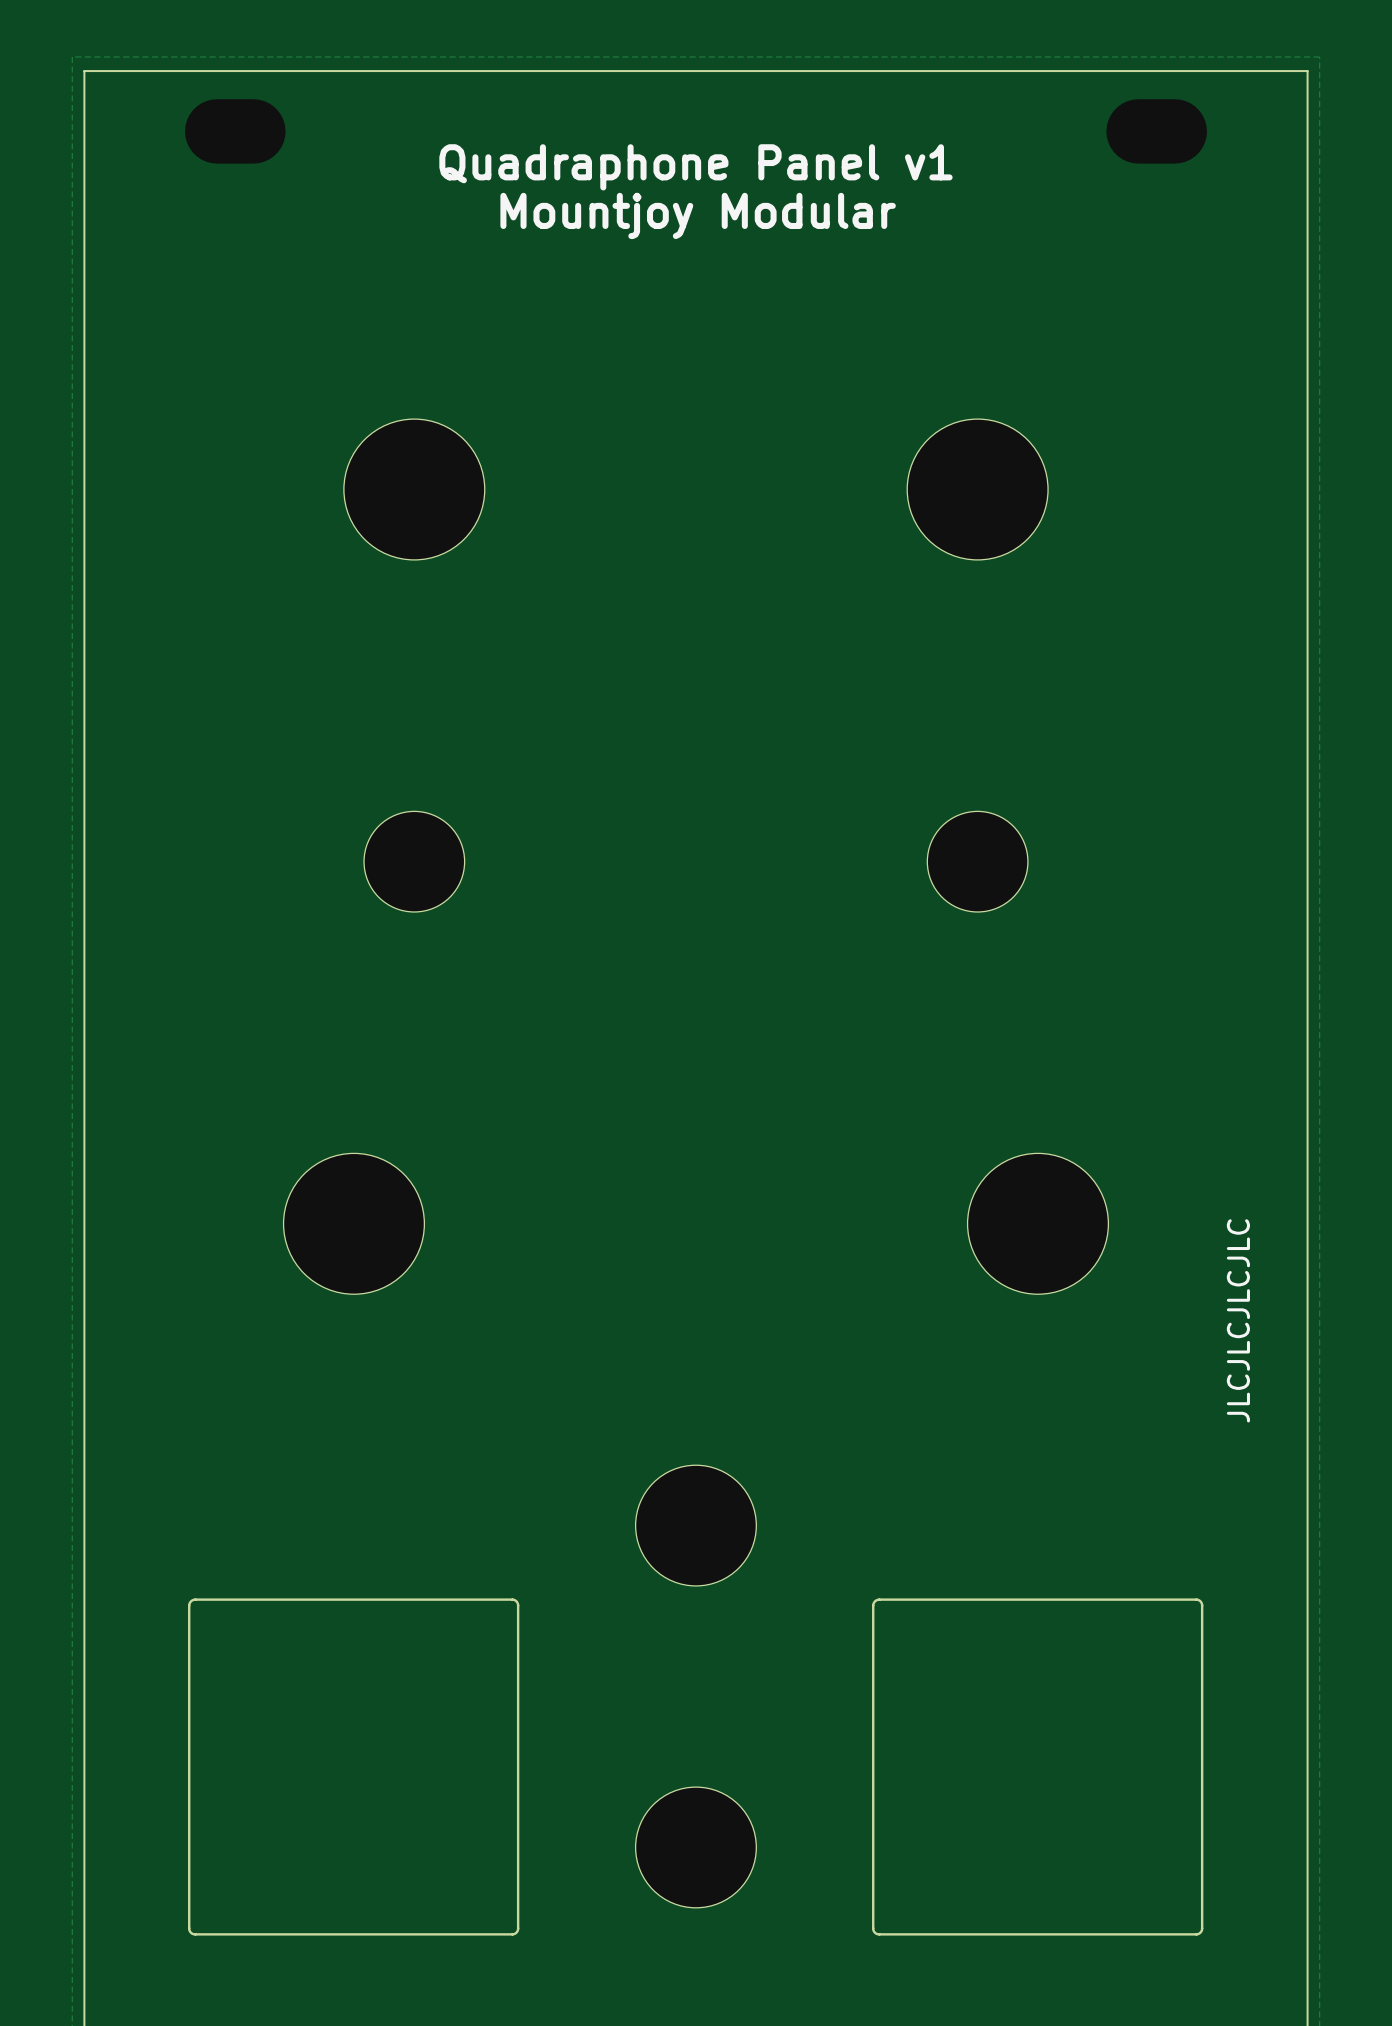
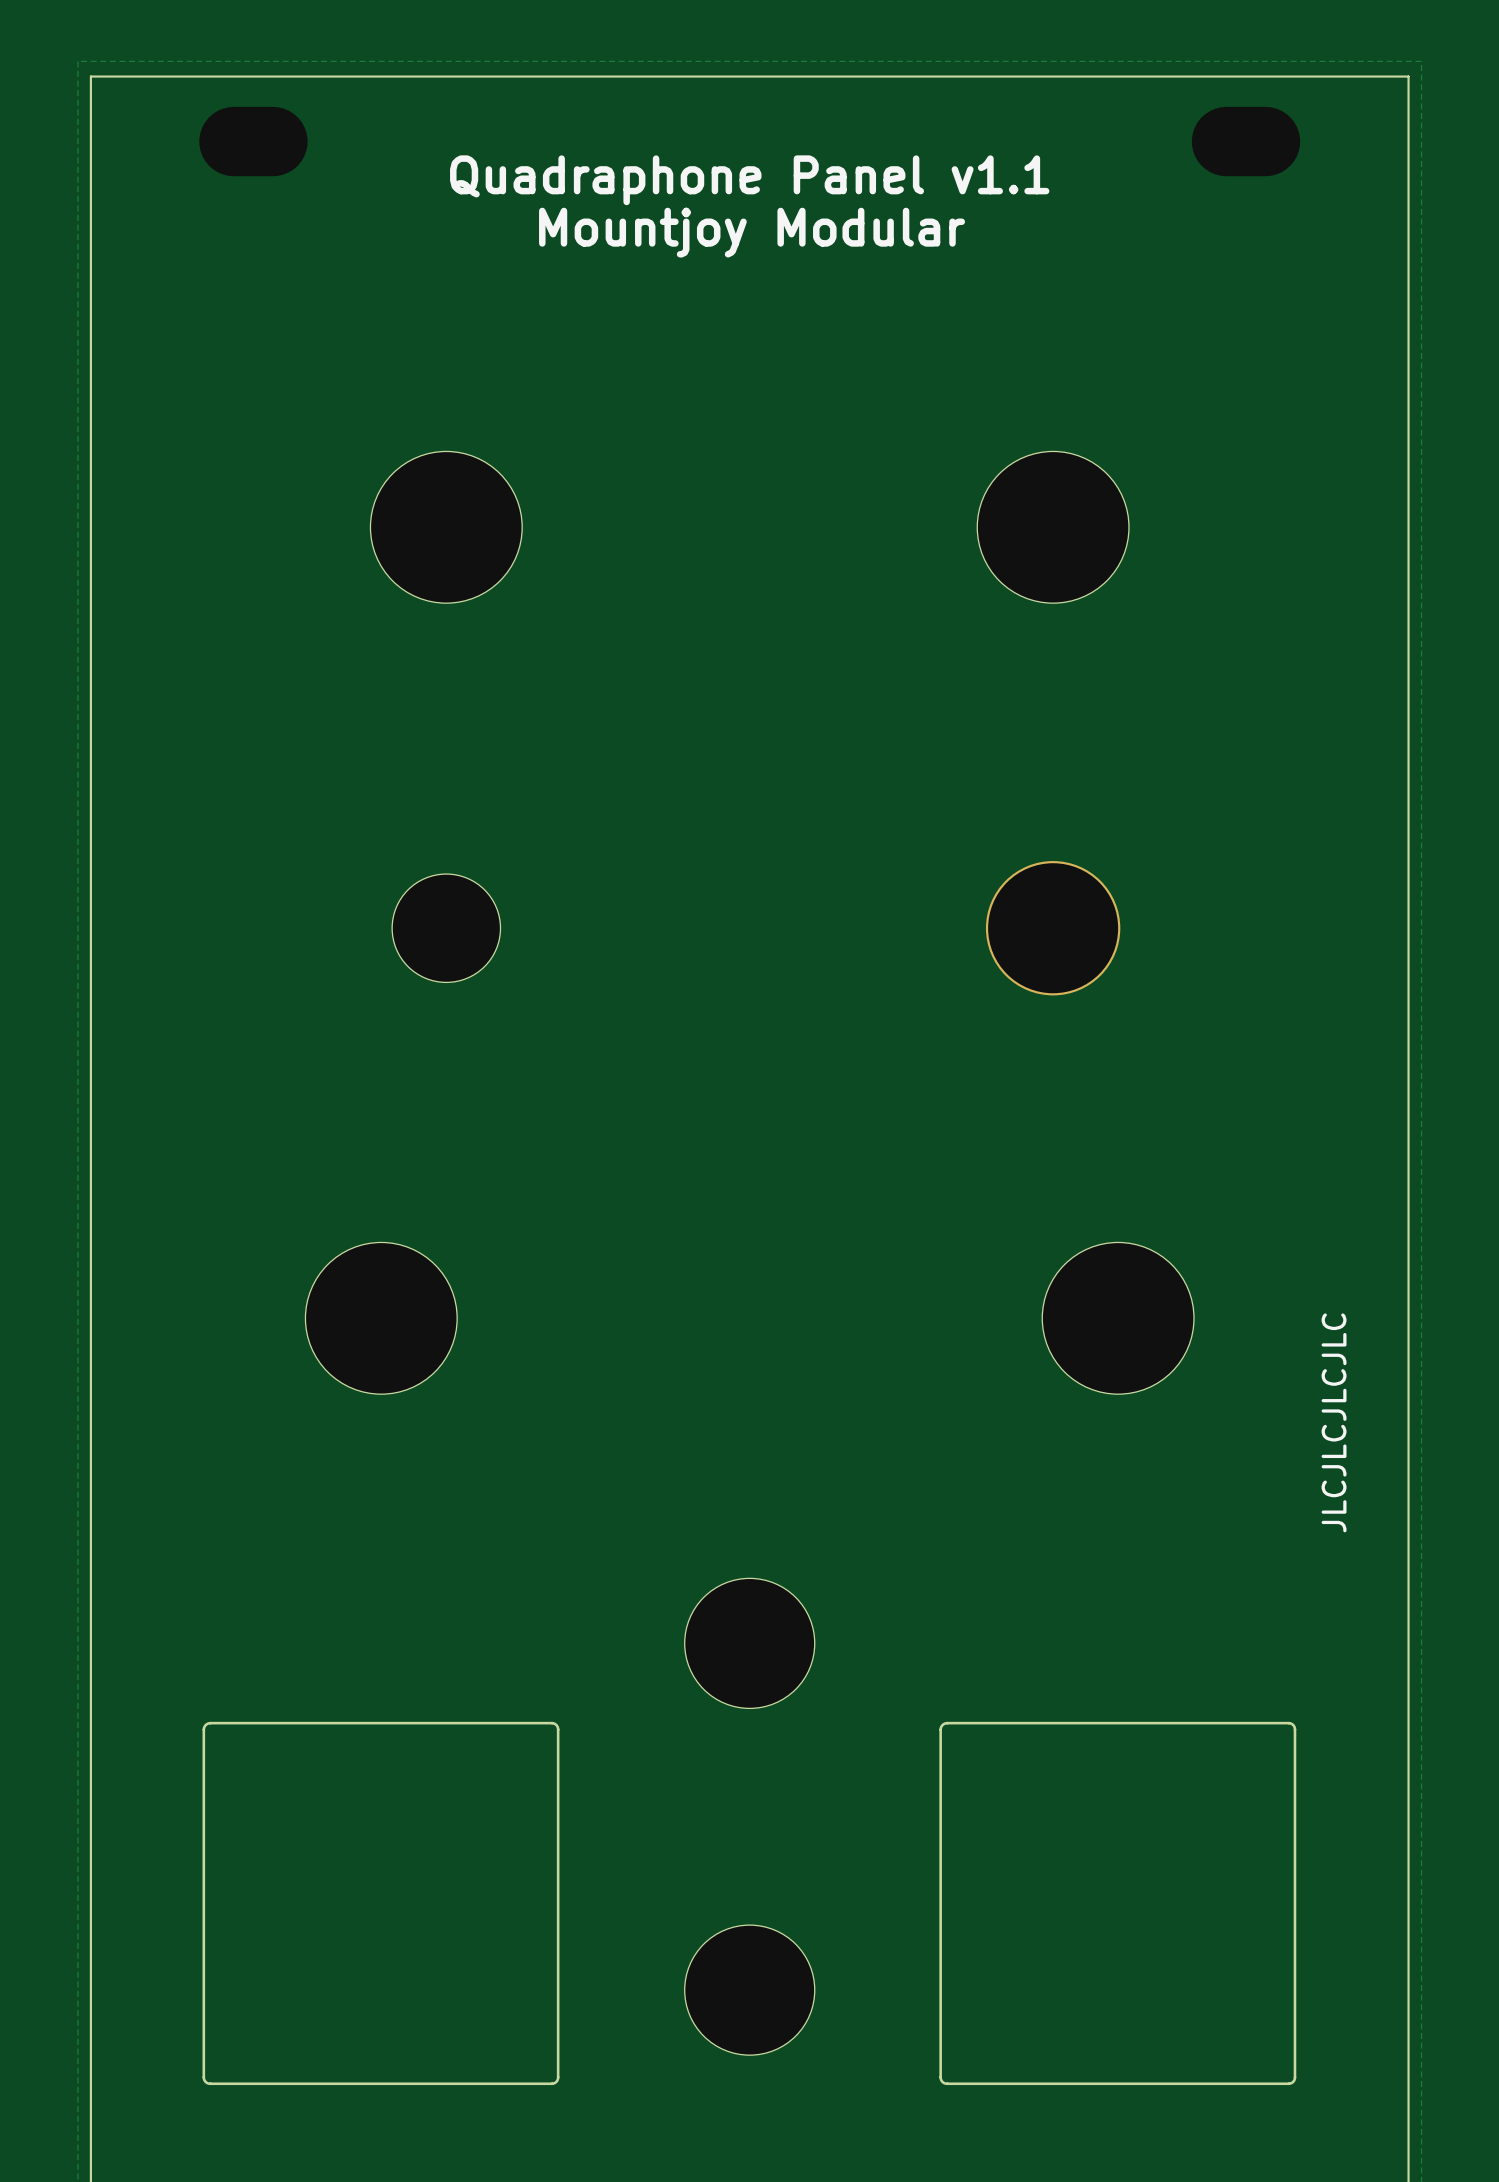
text: Quadraphone Panel v1 (695, 167) -> Quadraphone Panel v1.1 (749, 180)
part footprint: [927, 811, 1028, 912] -> [985, 861, 1121, 996]

